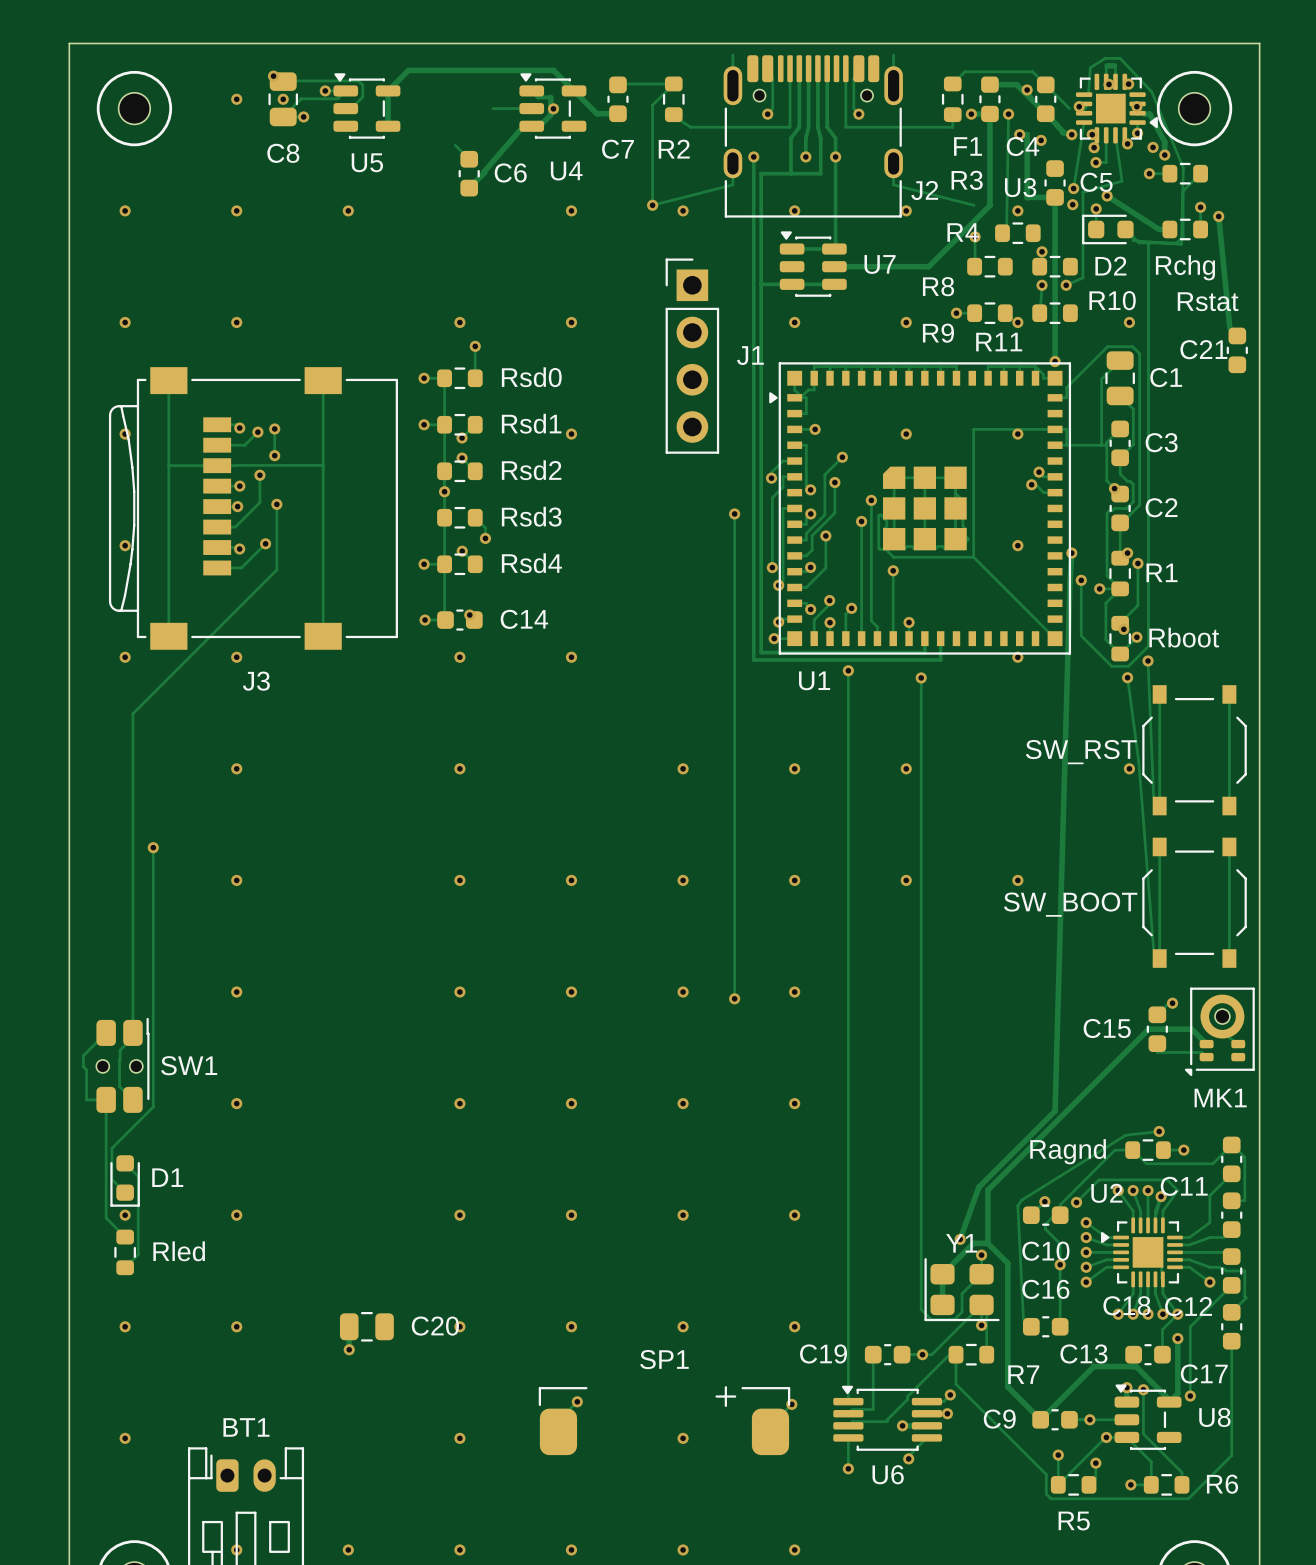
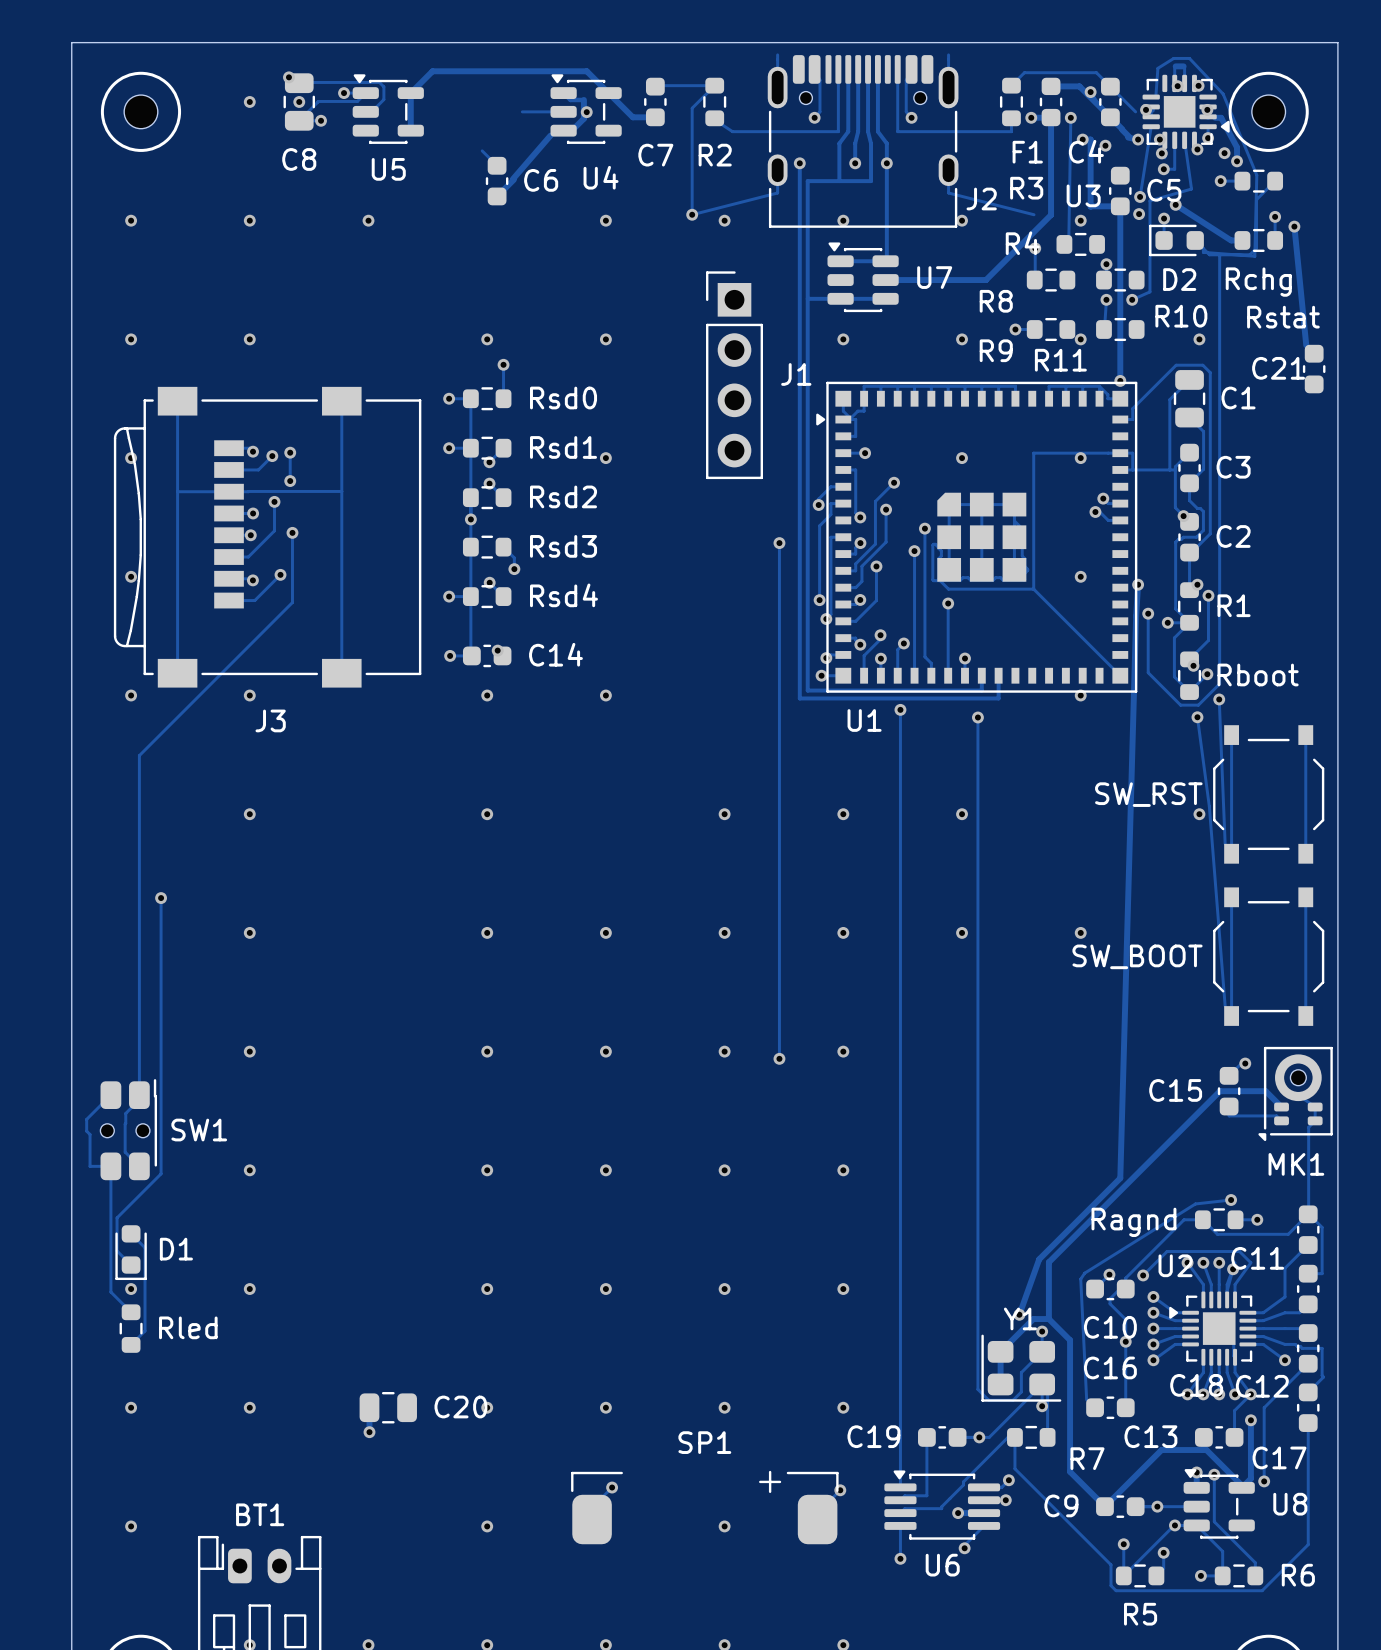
track: none -> (1315, 1107) (1315, 1120) (1308, 1127) (1308, 1213)

